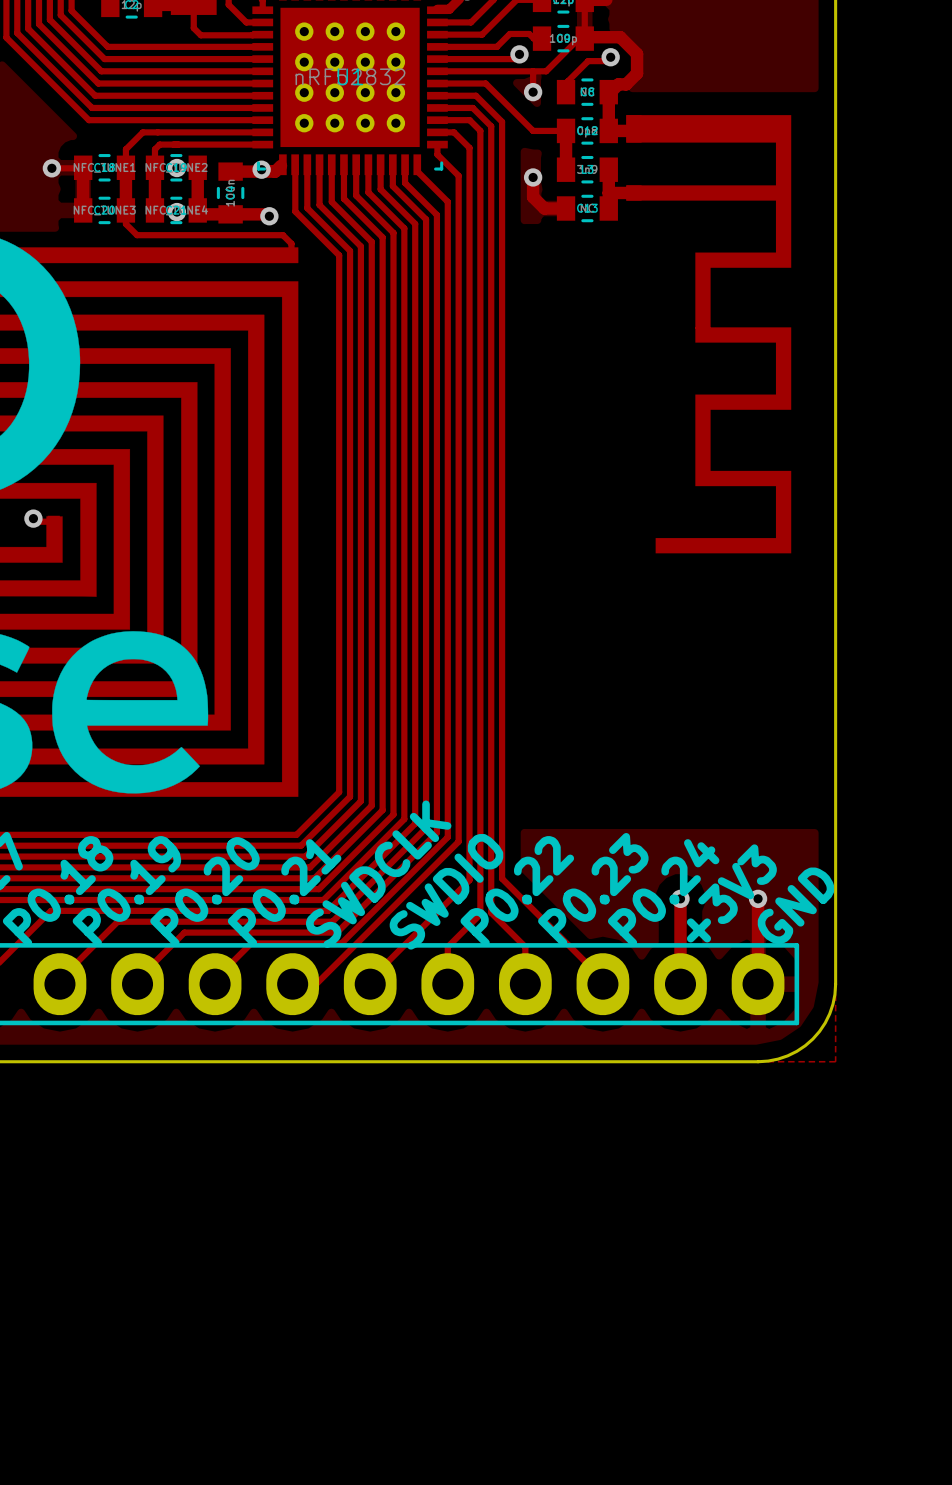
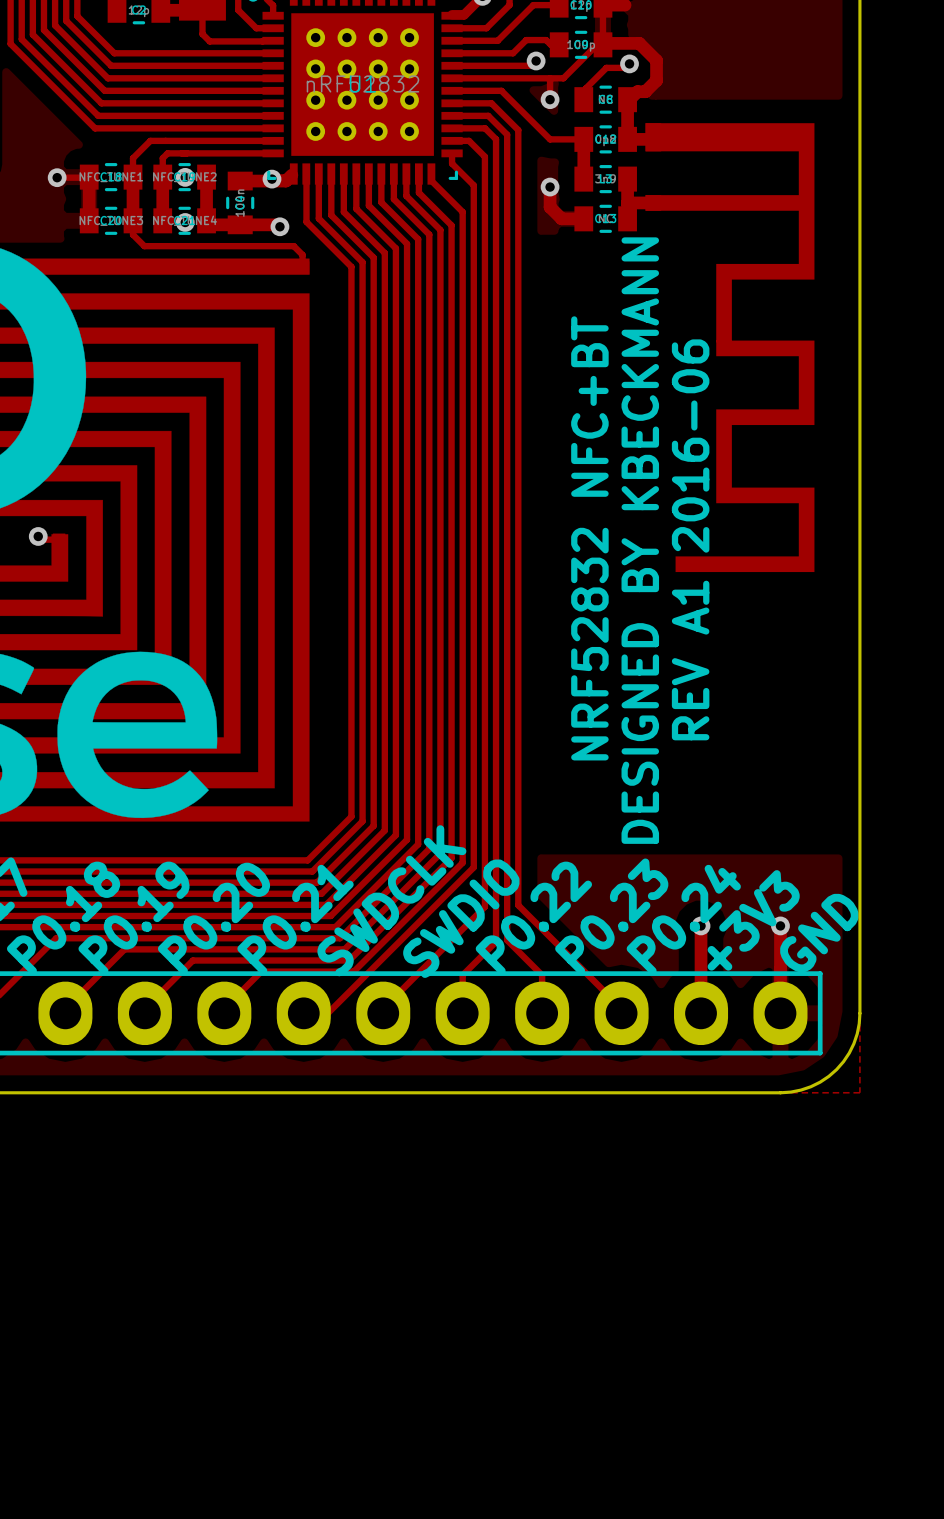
text: none -> NRF52832 NFC+BT (589, 538)
text: none -> REV A1 2016-06 (690, 539)
text: none -> DESIGNED BY KBECKMANN (640, 540)

